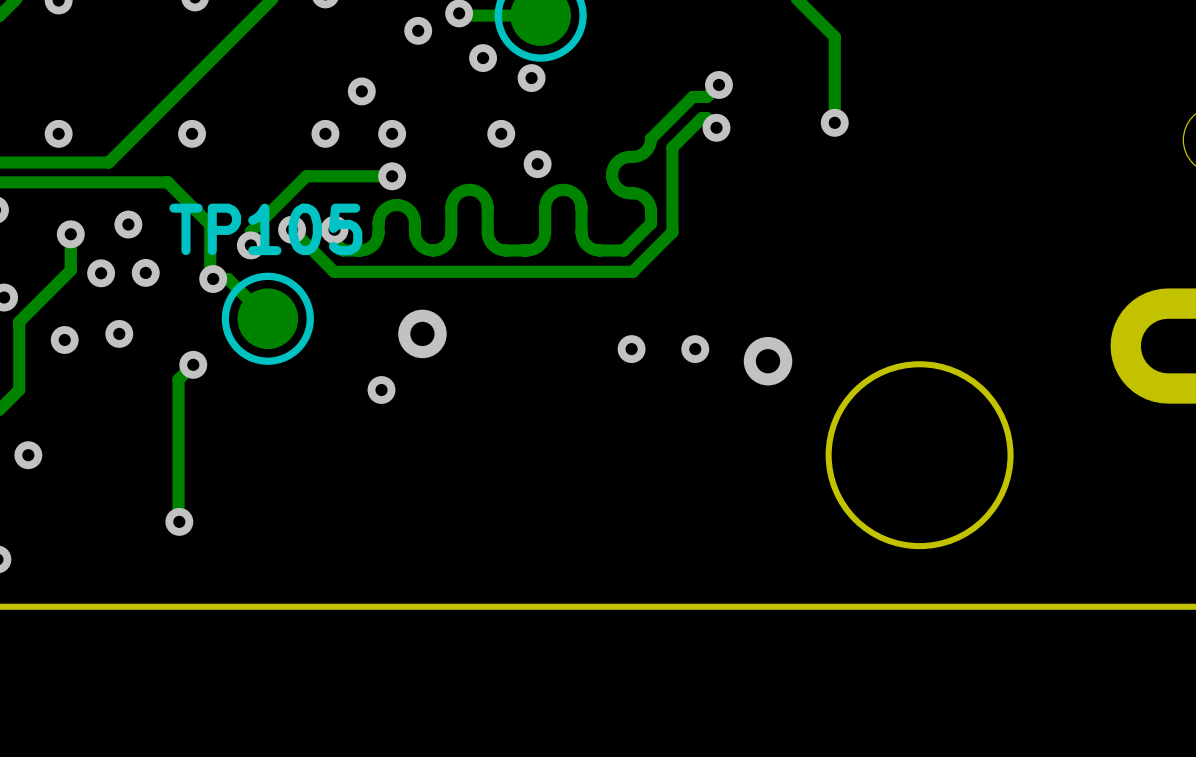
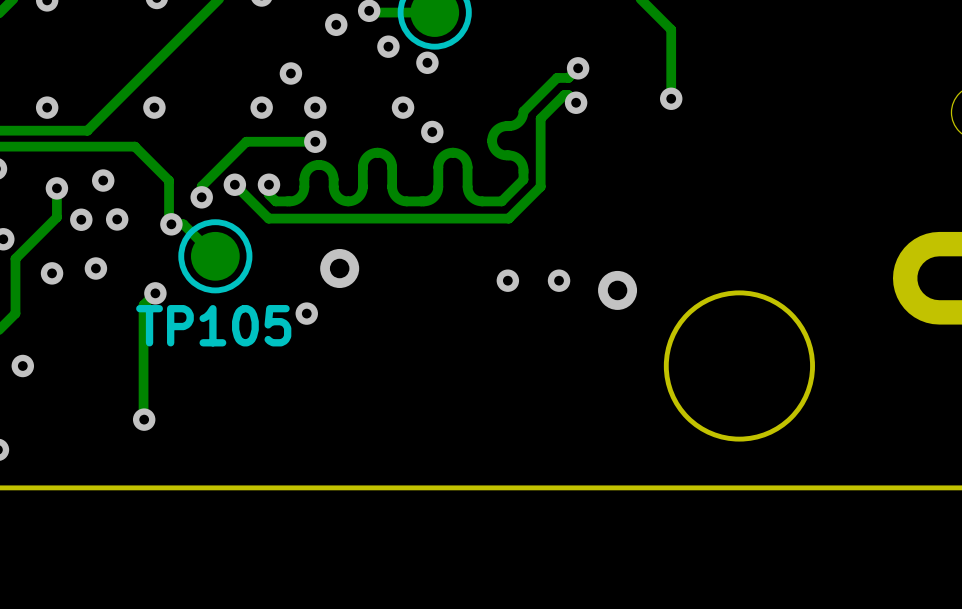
TP105 name position: TP105 (265, 229) -> TP105 (213, 325)

